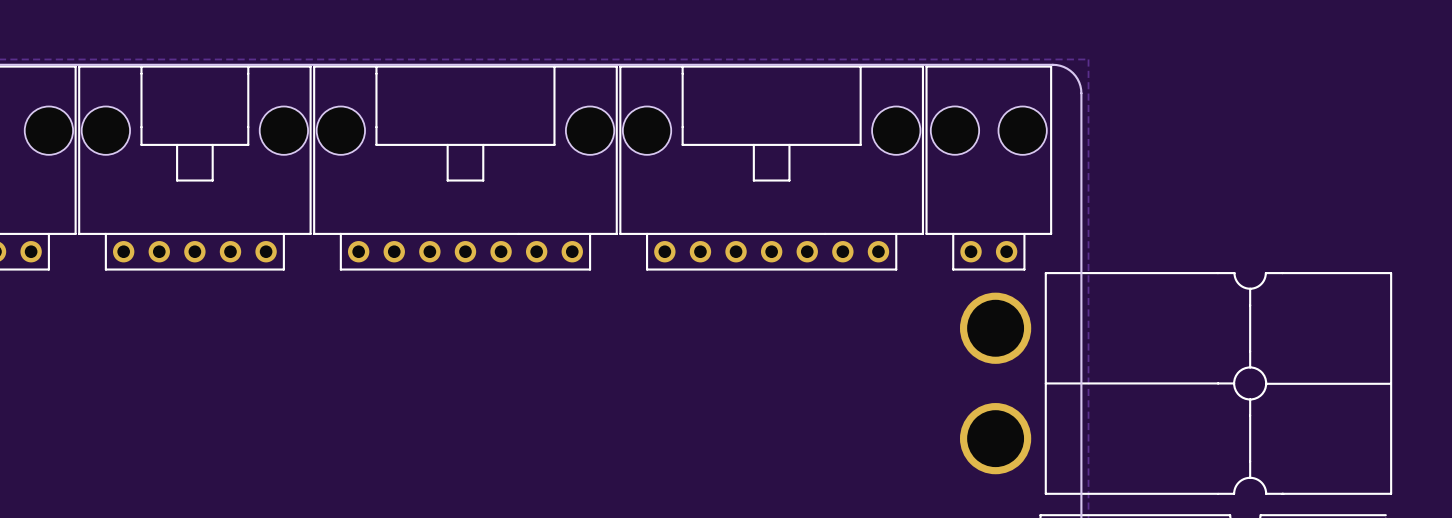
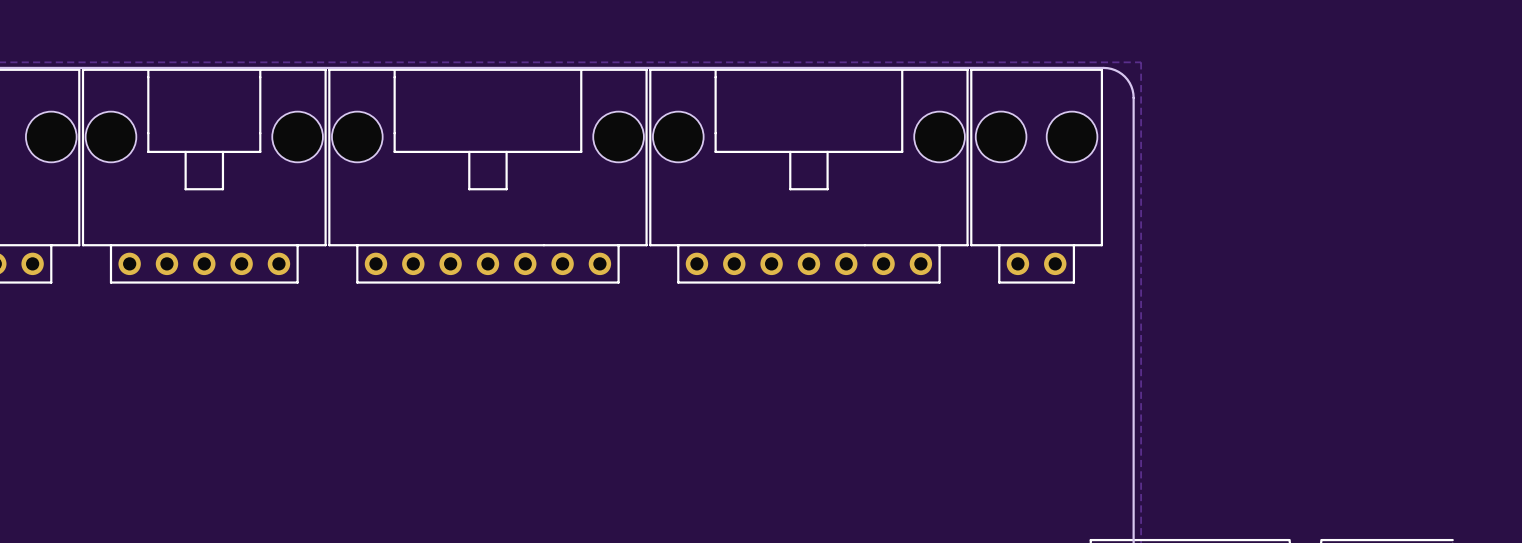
part: (1176, 383) -> none

